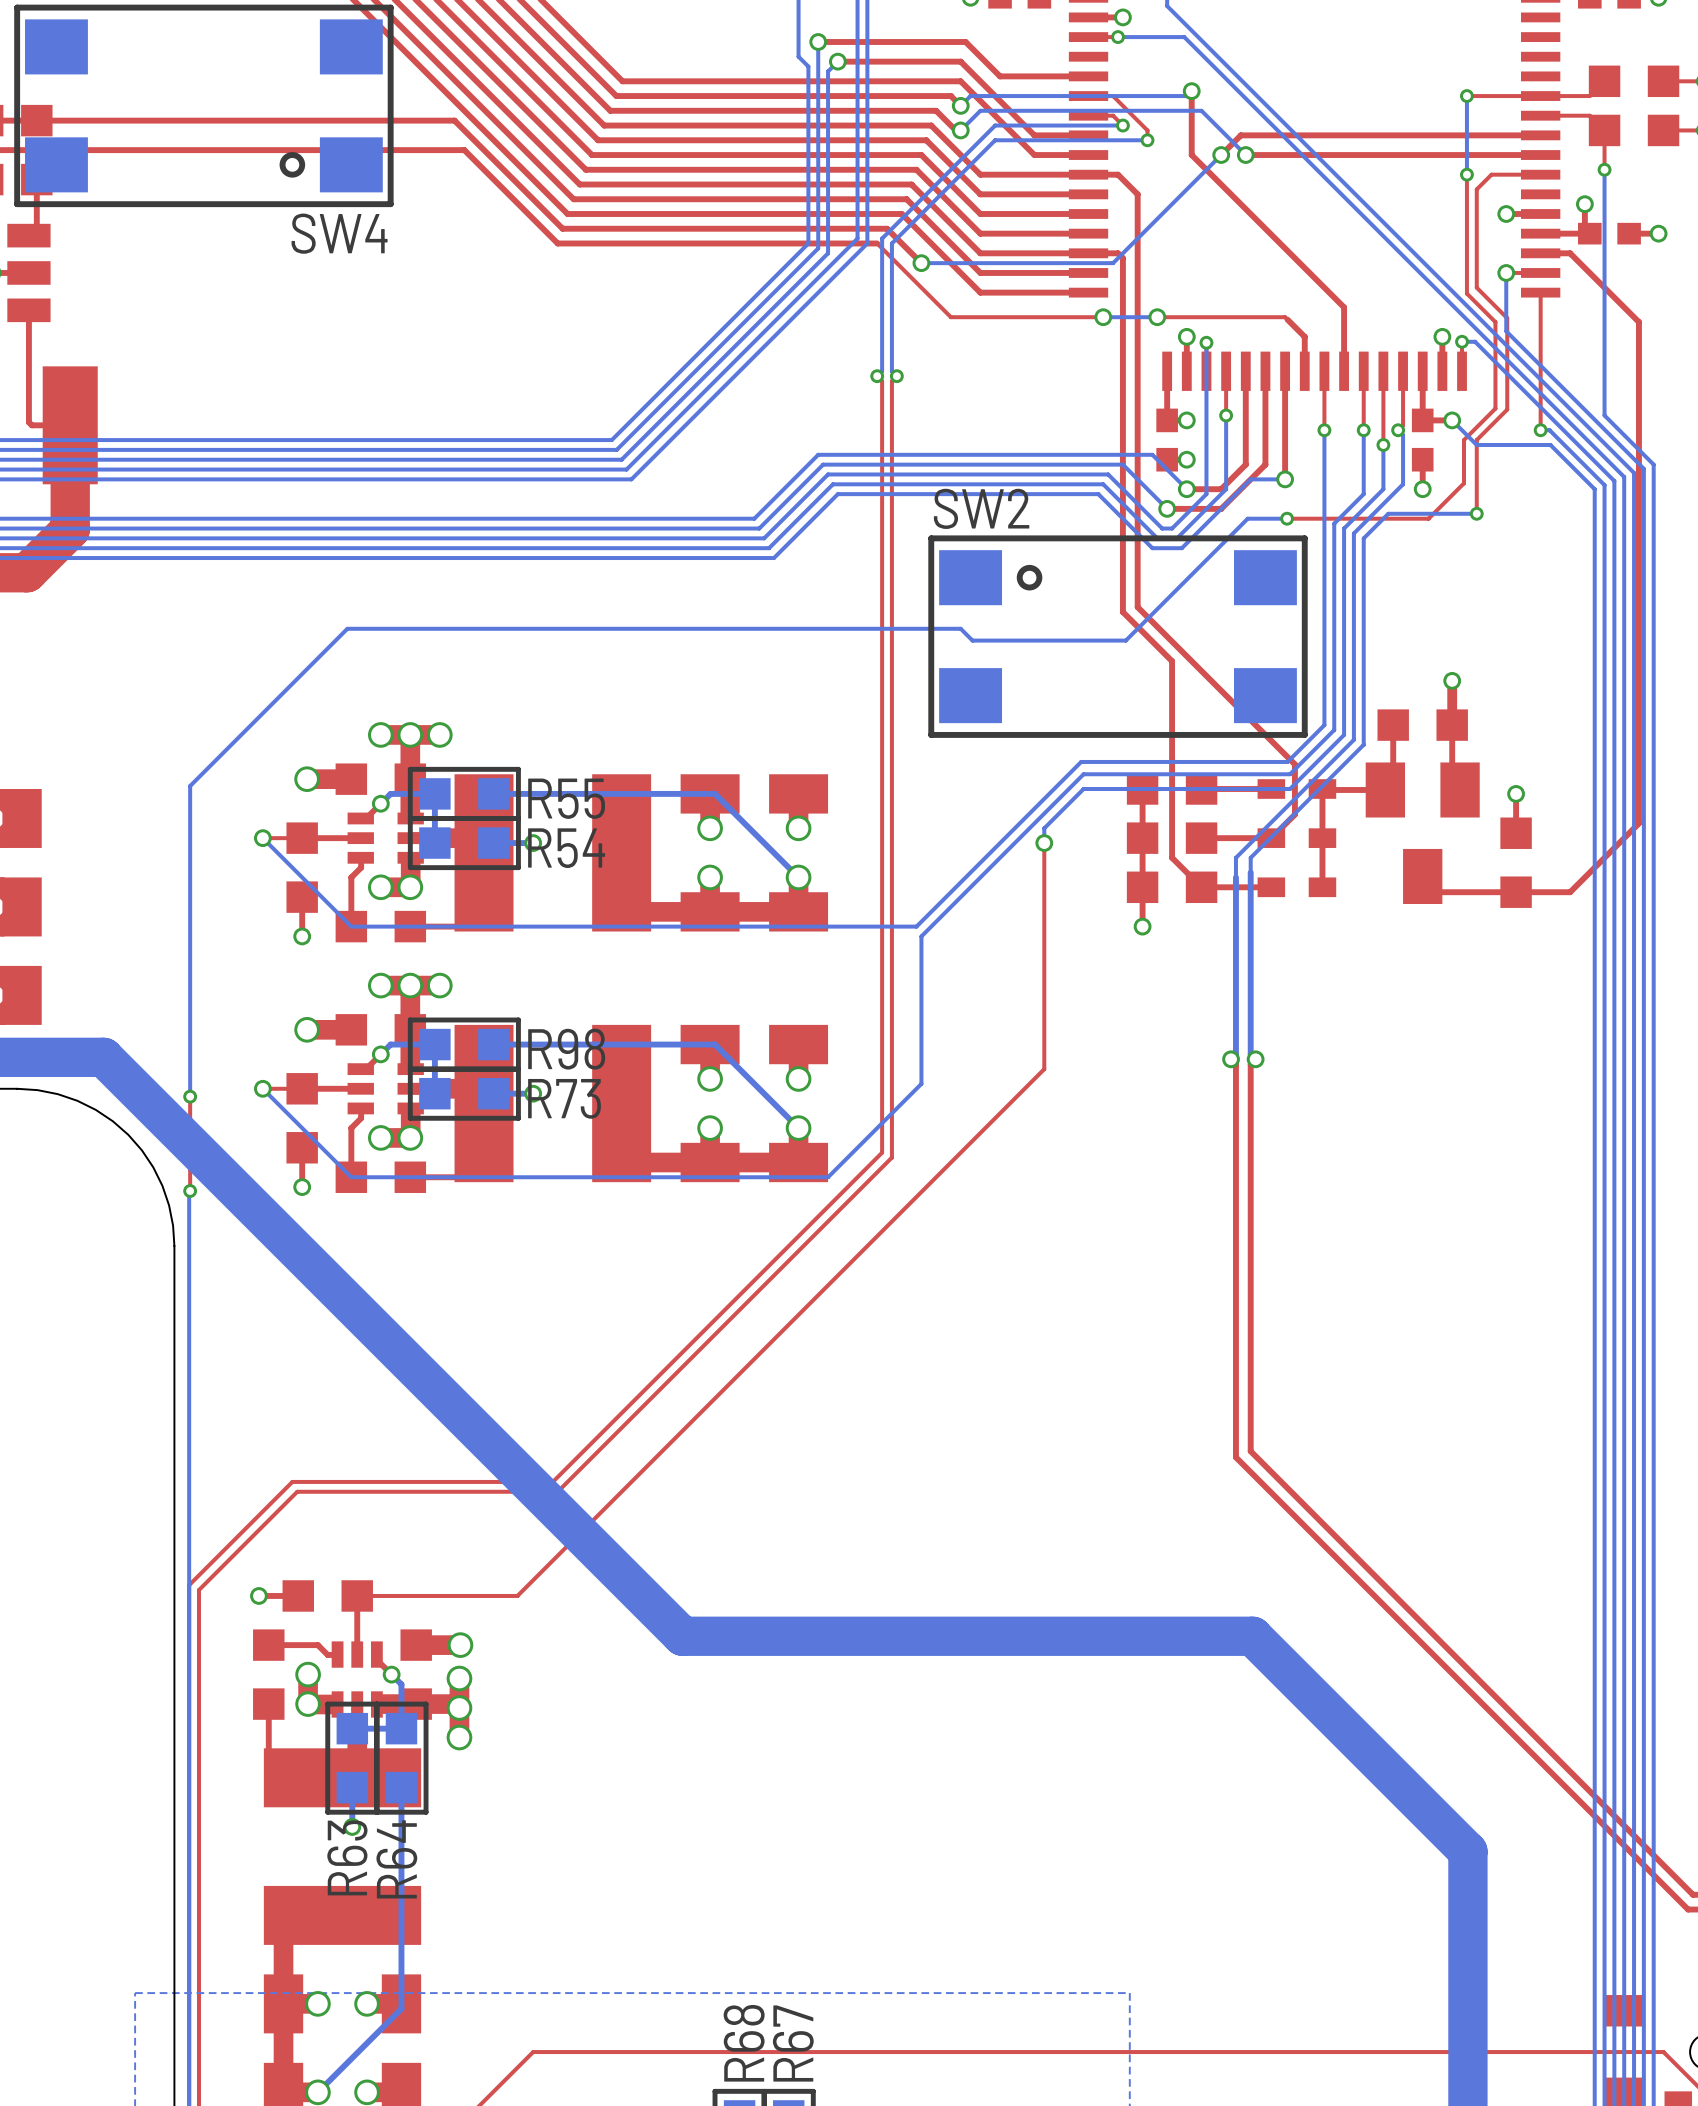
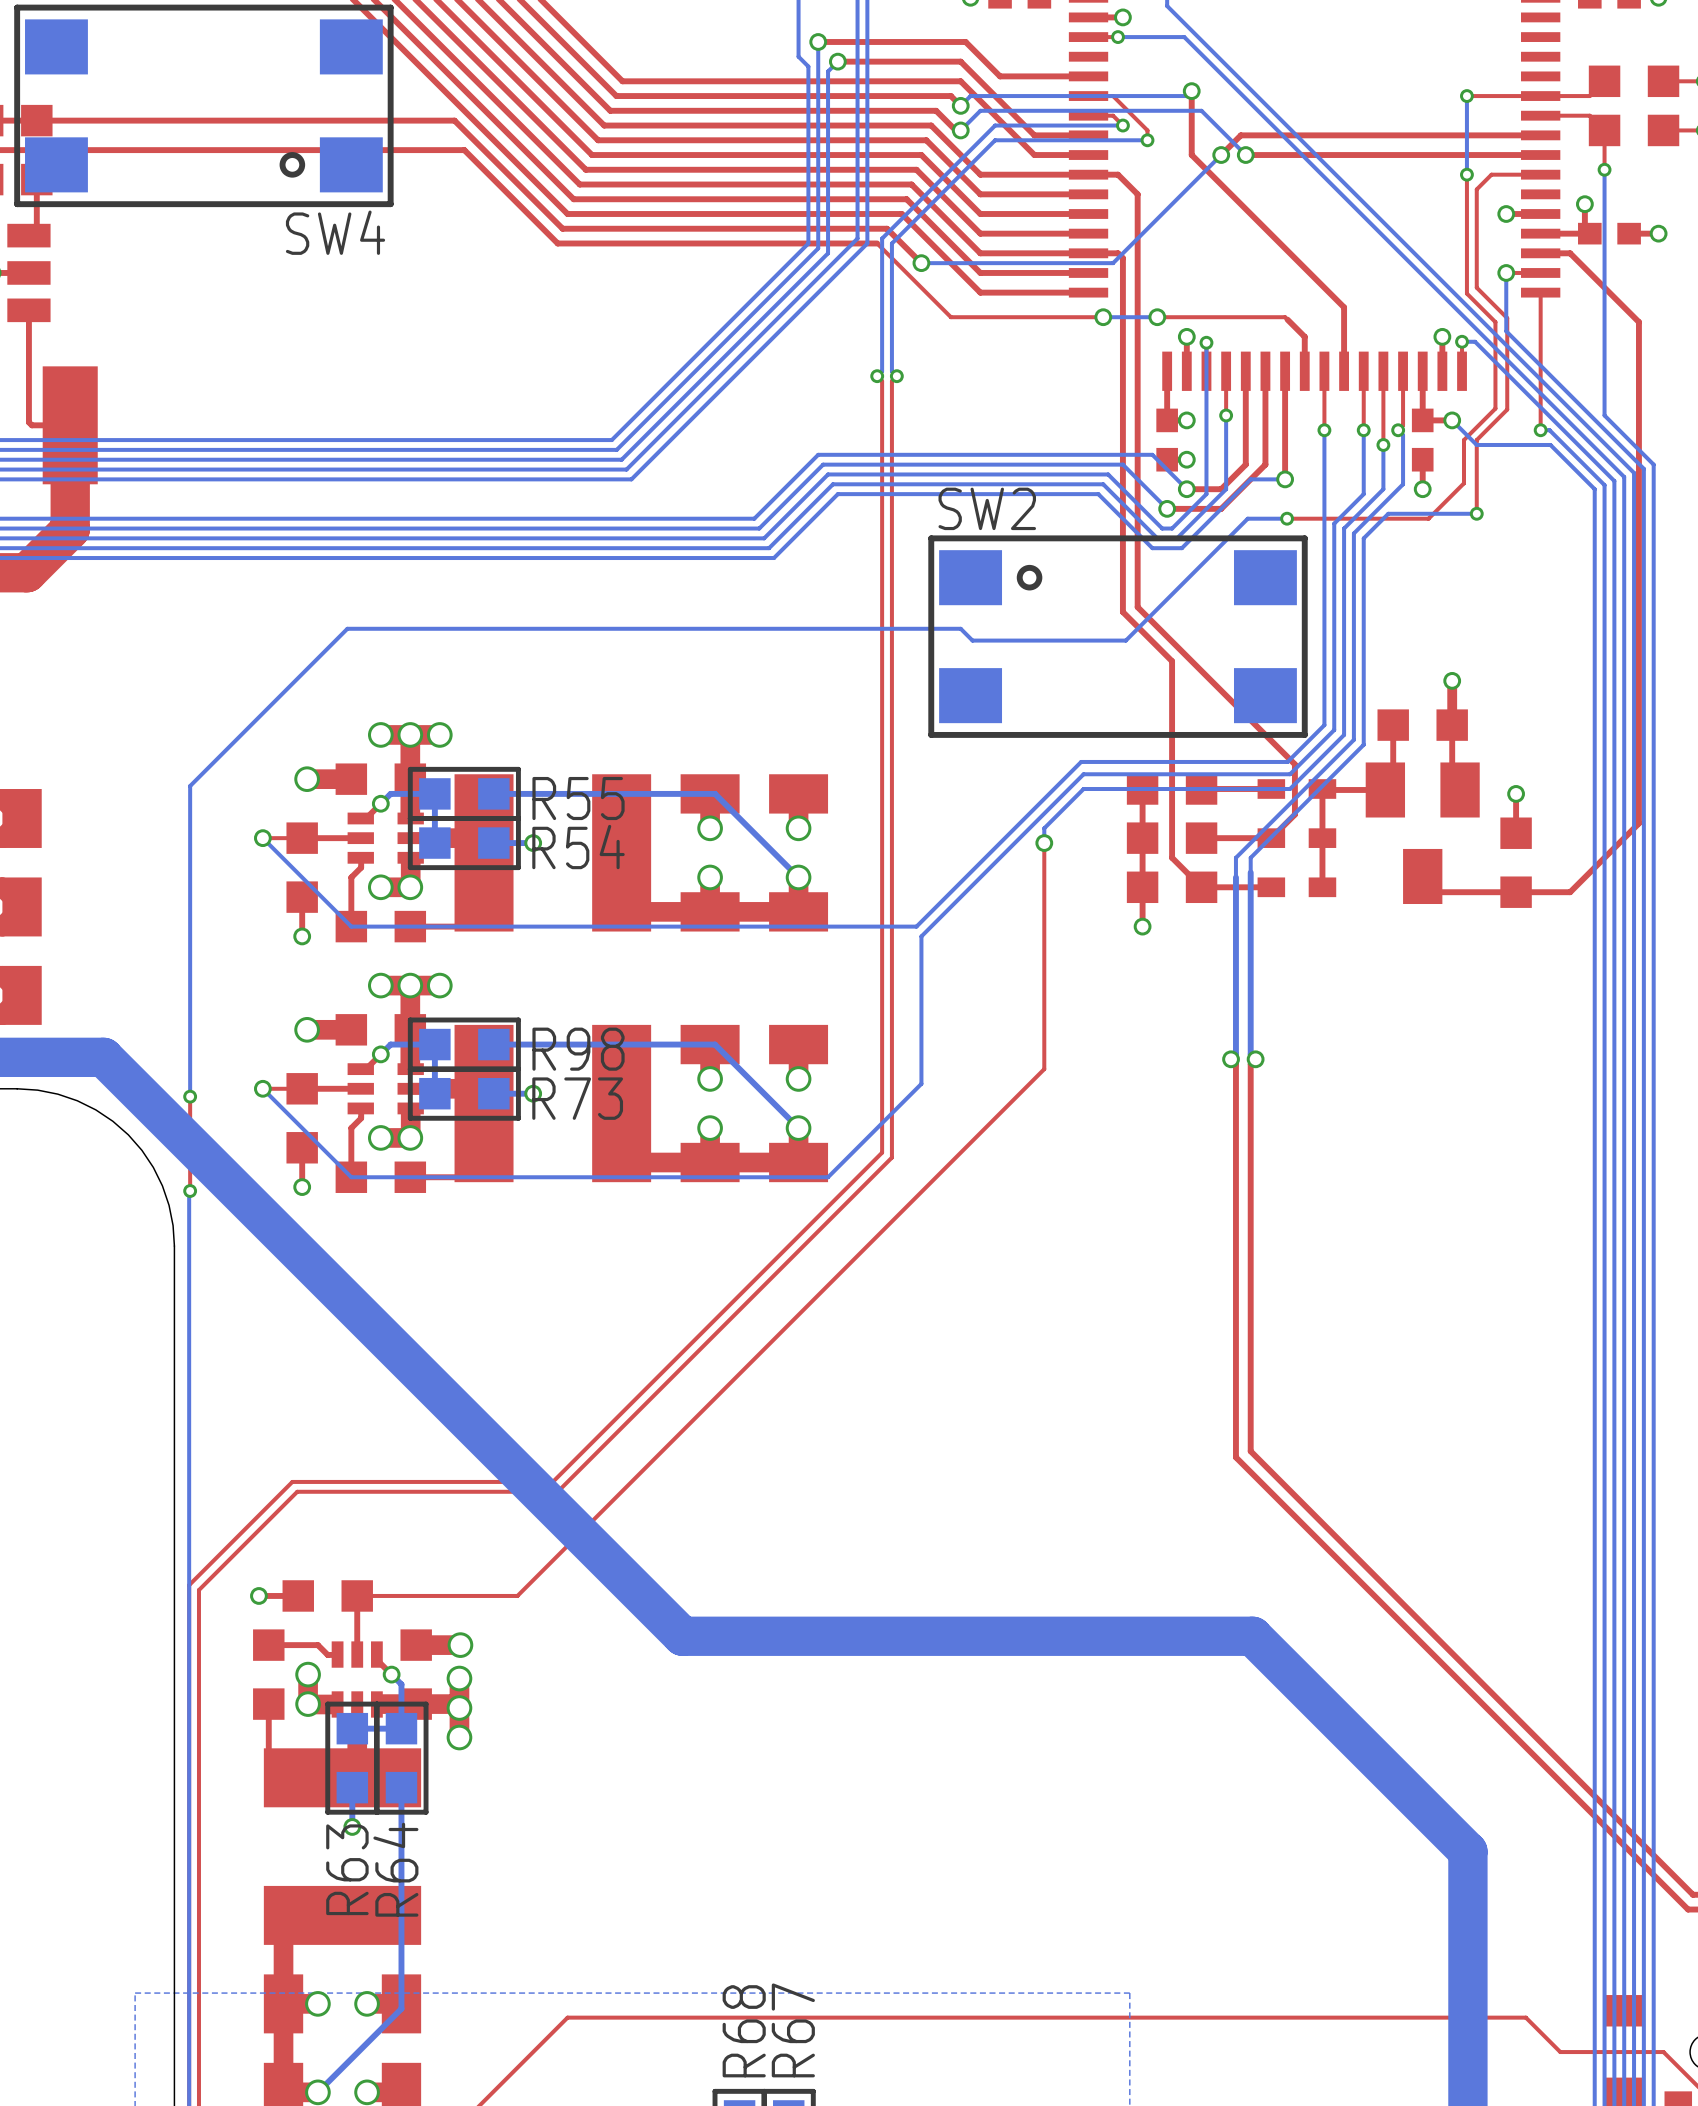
top track: (1560, 2052) (533, 2052) -> (1560, 2052) (1525, 2017) (567, 2017) (533, 2052)

